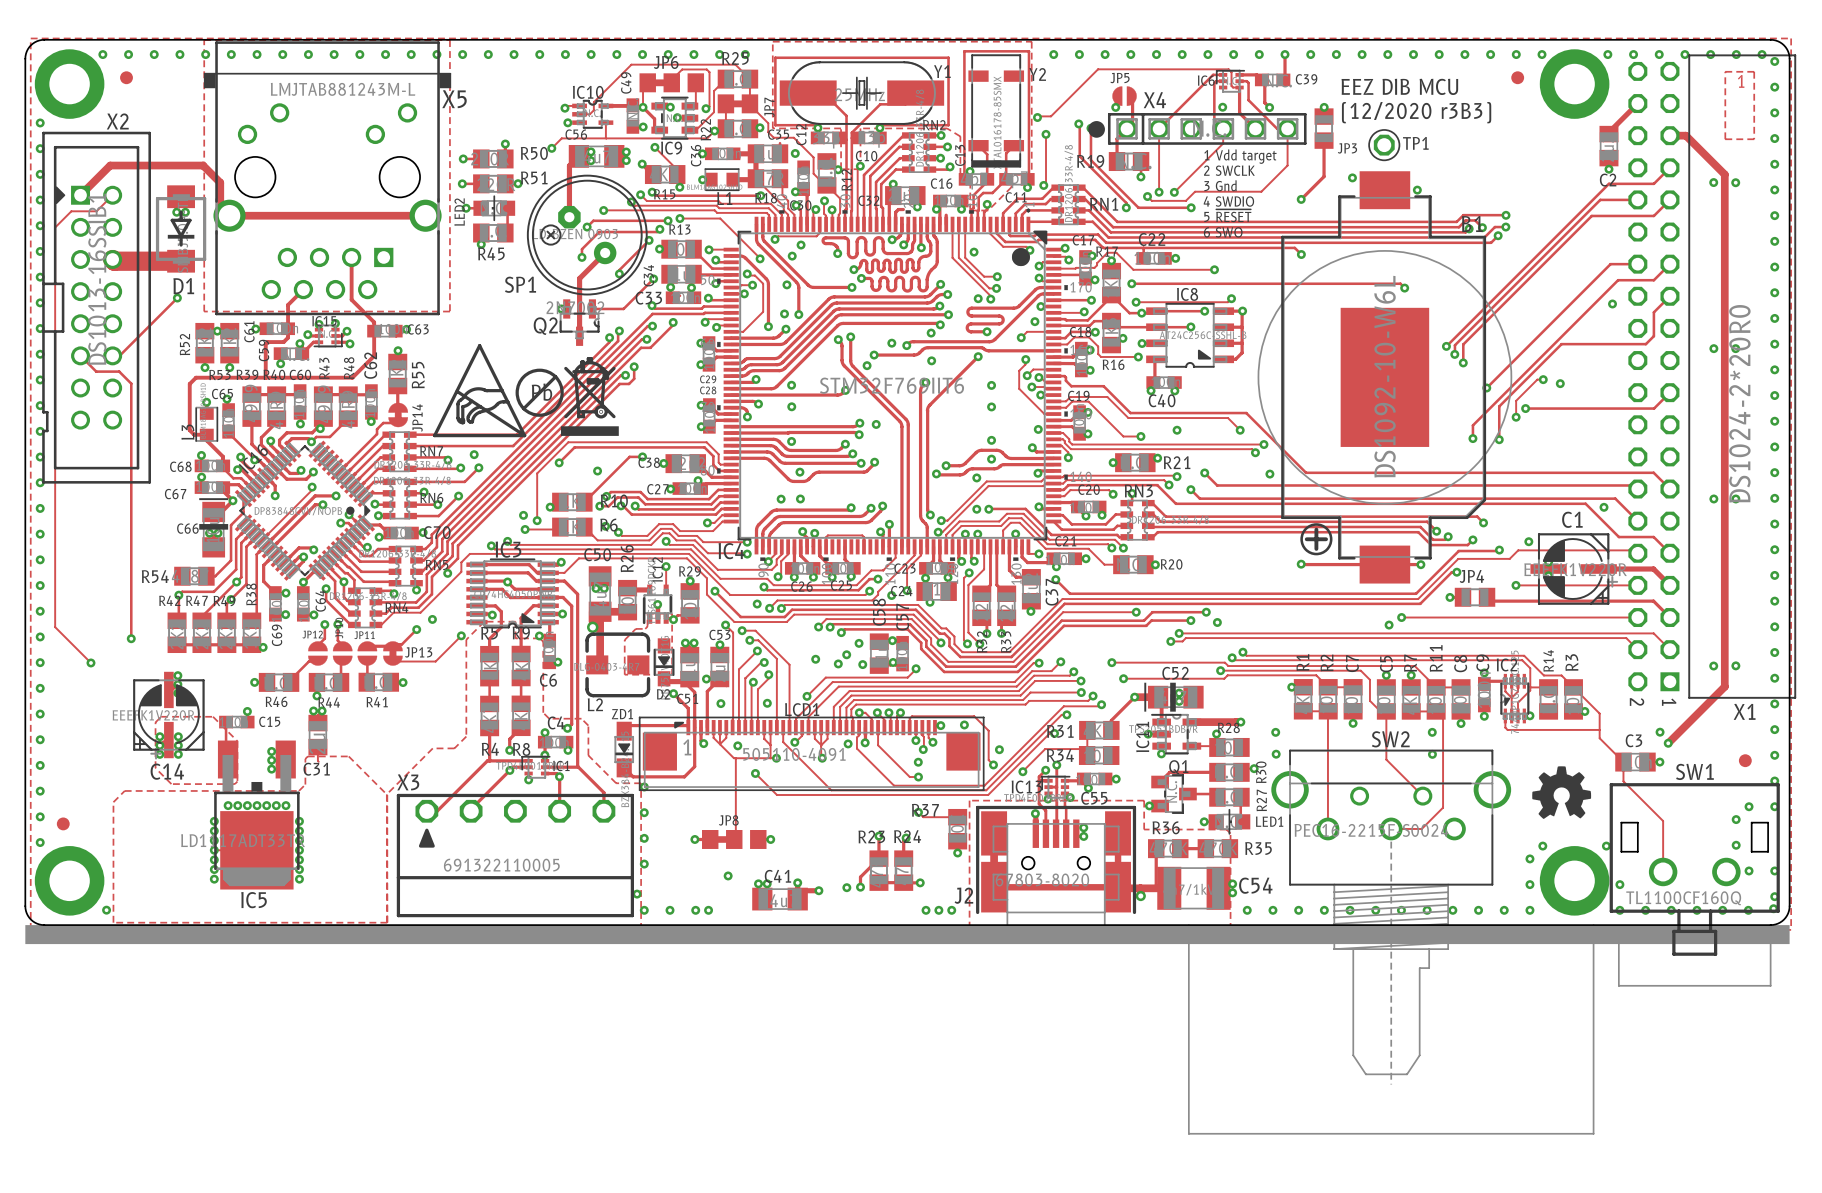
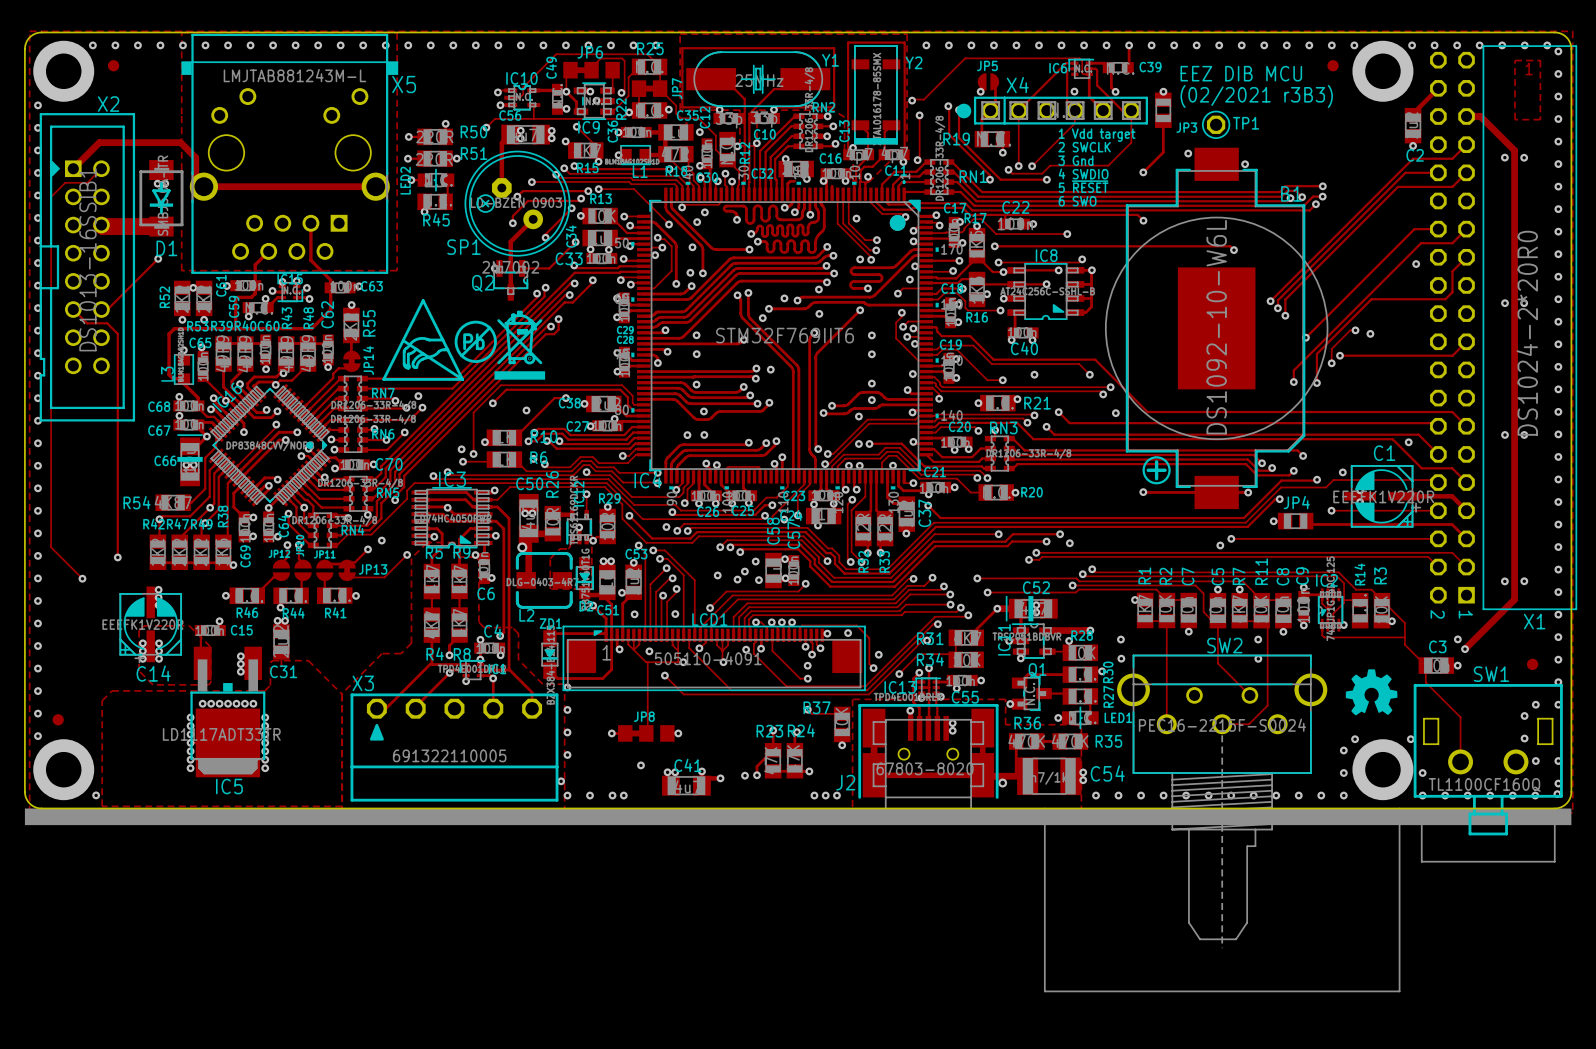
text: (12/2020 r3B3) (1416, 112) -> (02/2021 r3B3) (1256, 96)

